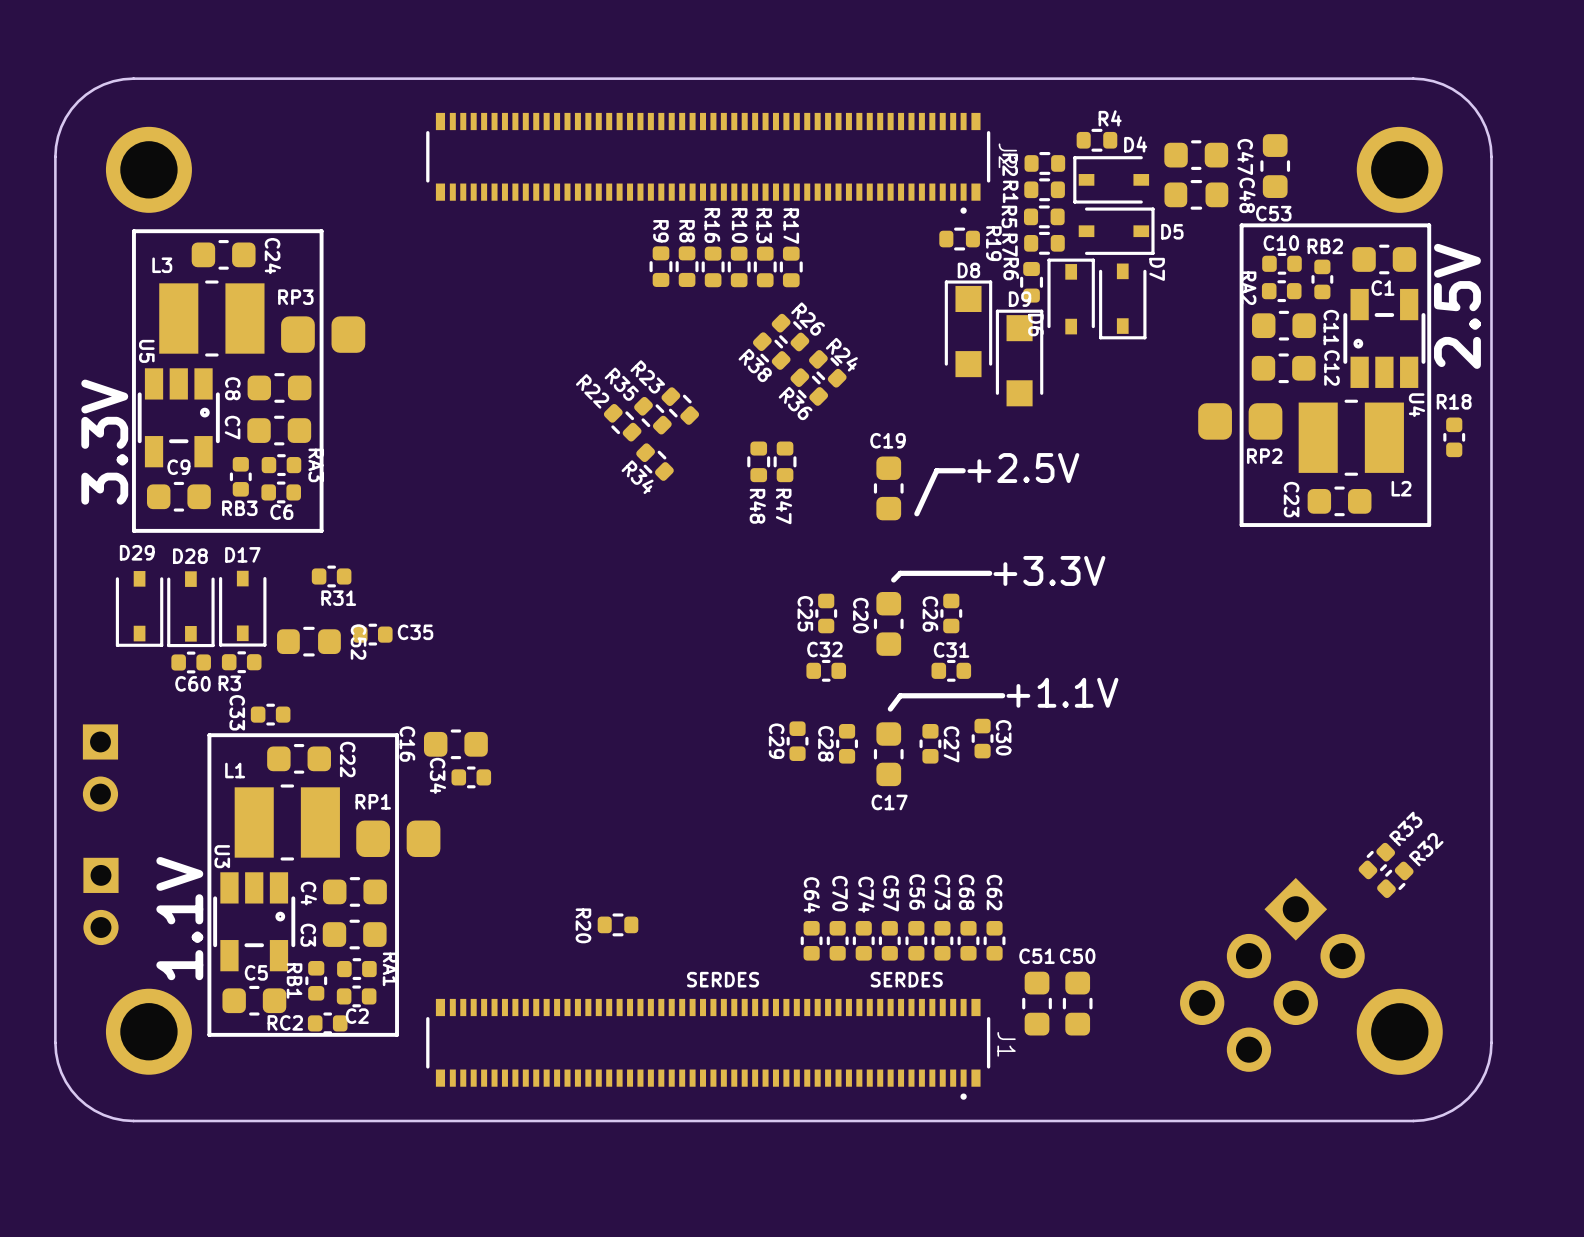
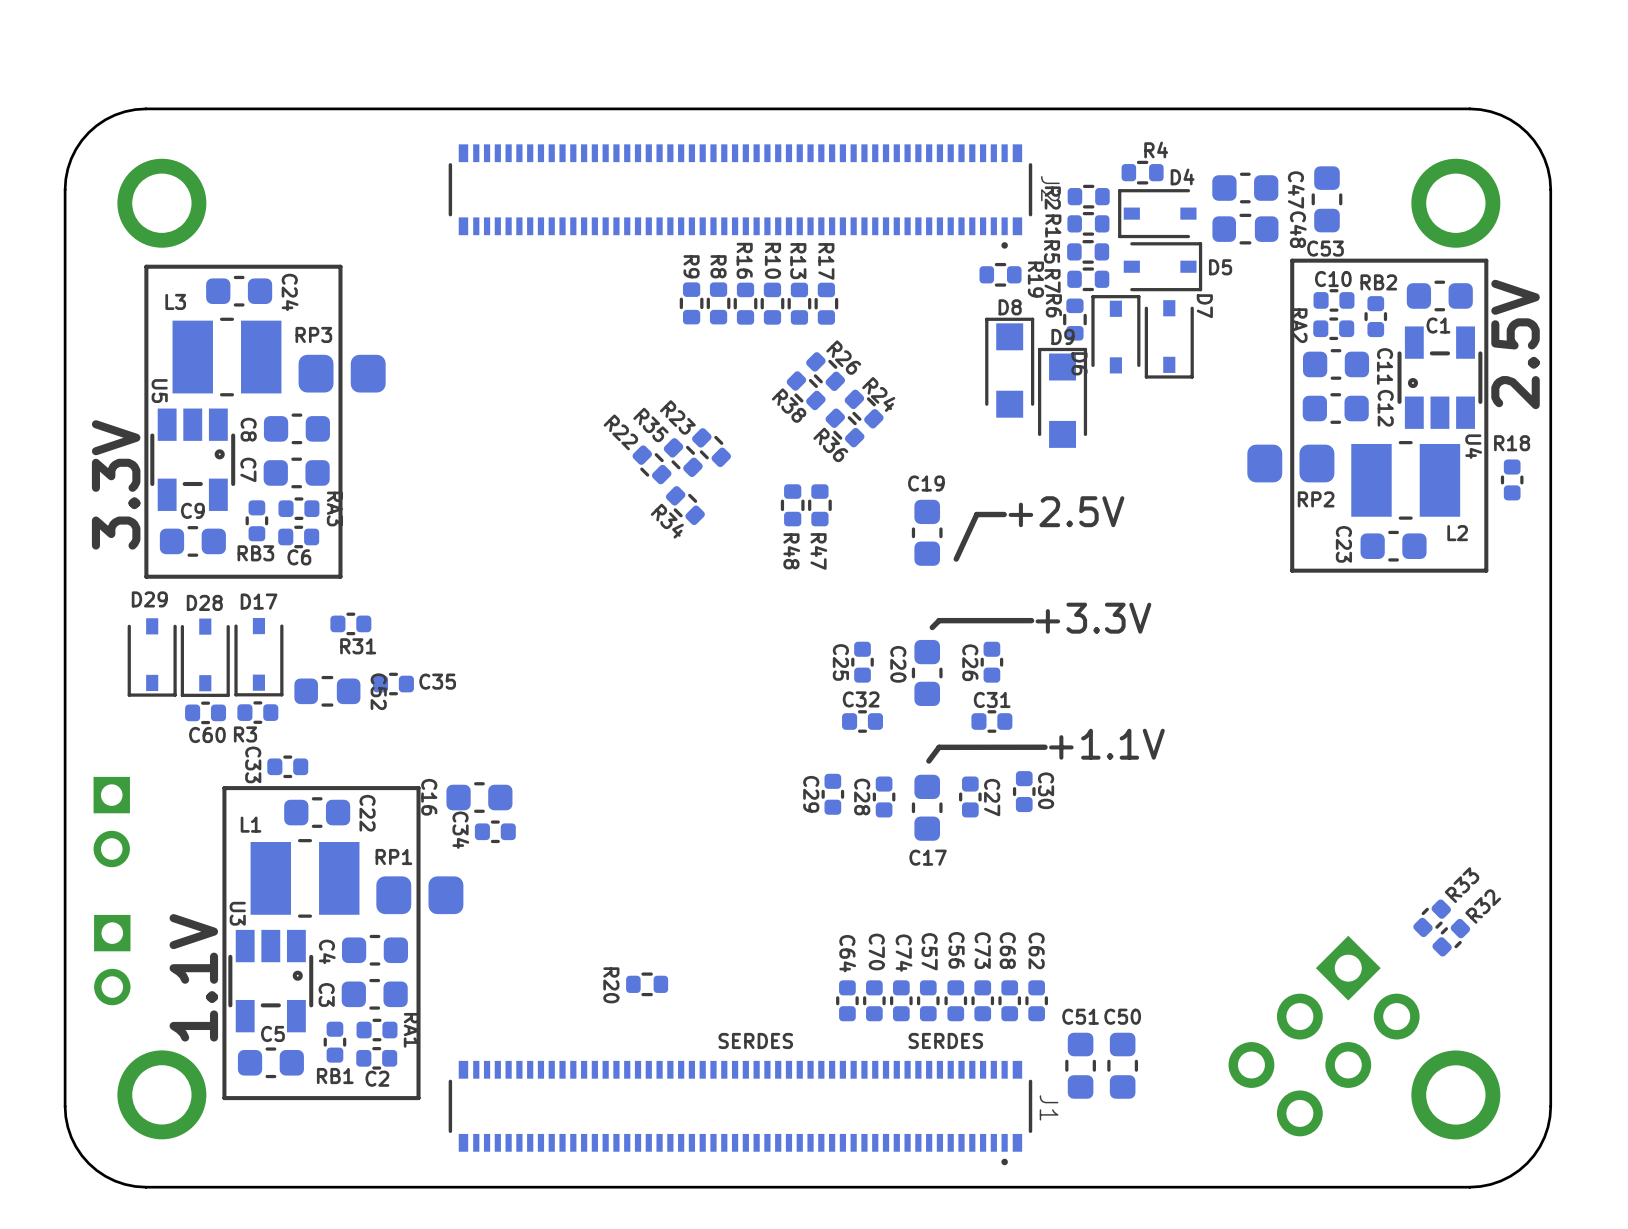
RB1 name rotation: 0° (294, 980) -> 90° counterclockwise (335, 1076)
RC2: (327, 1023) -> none

